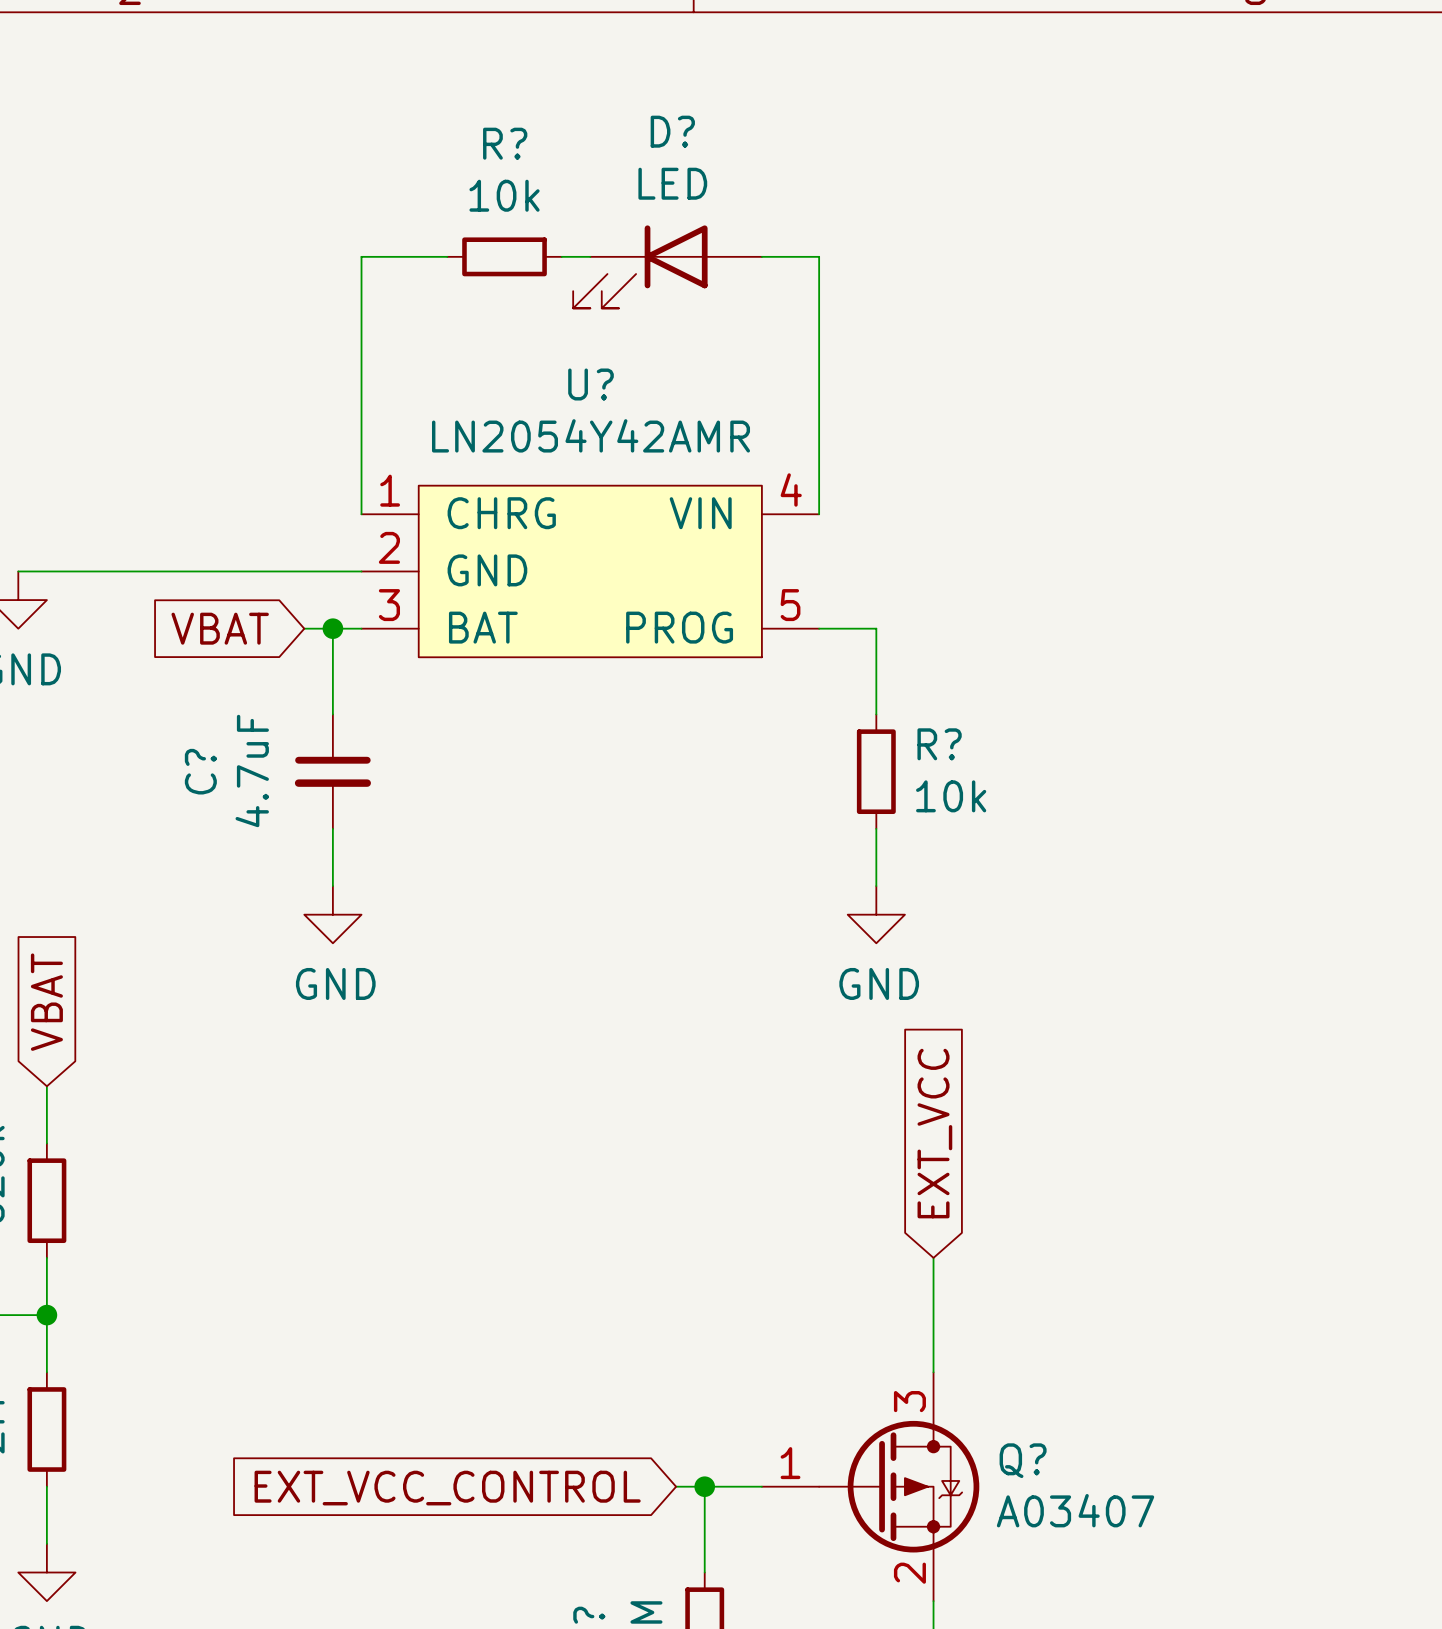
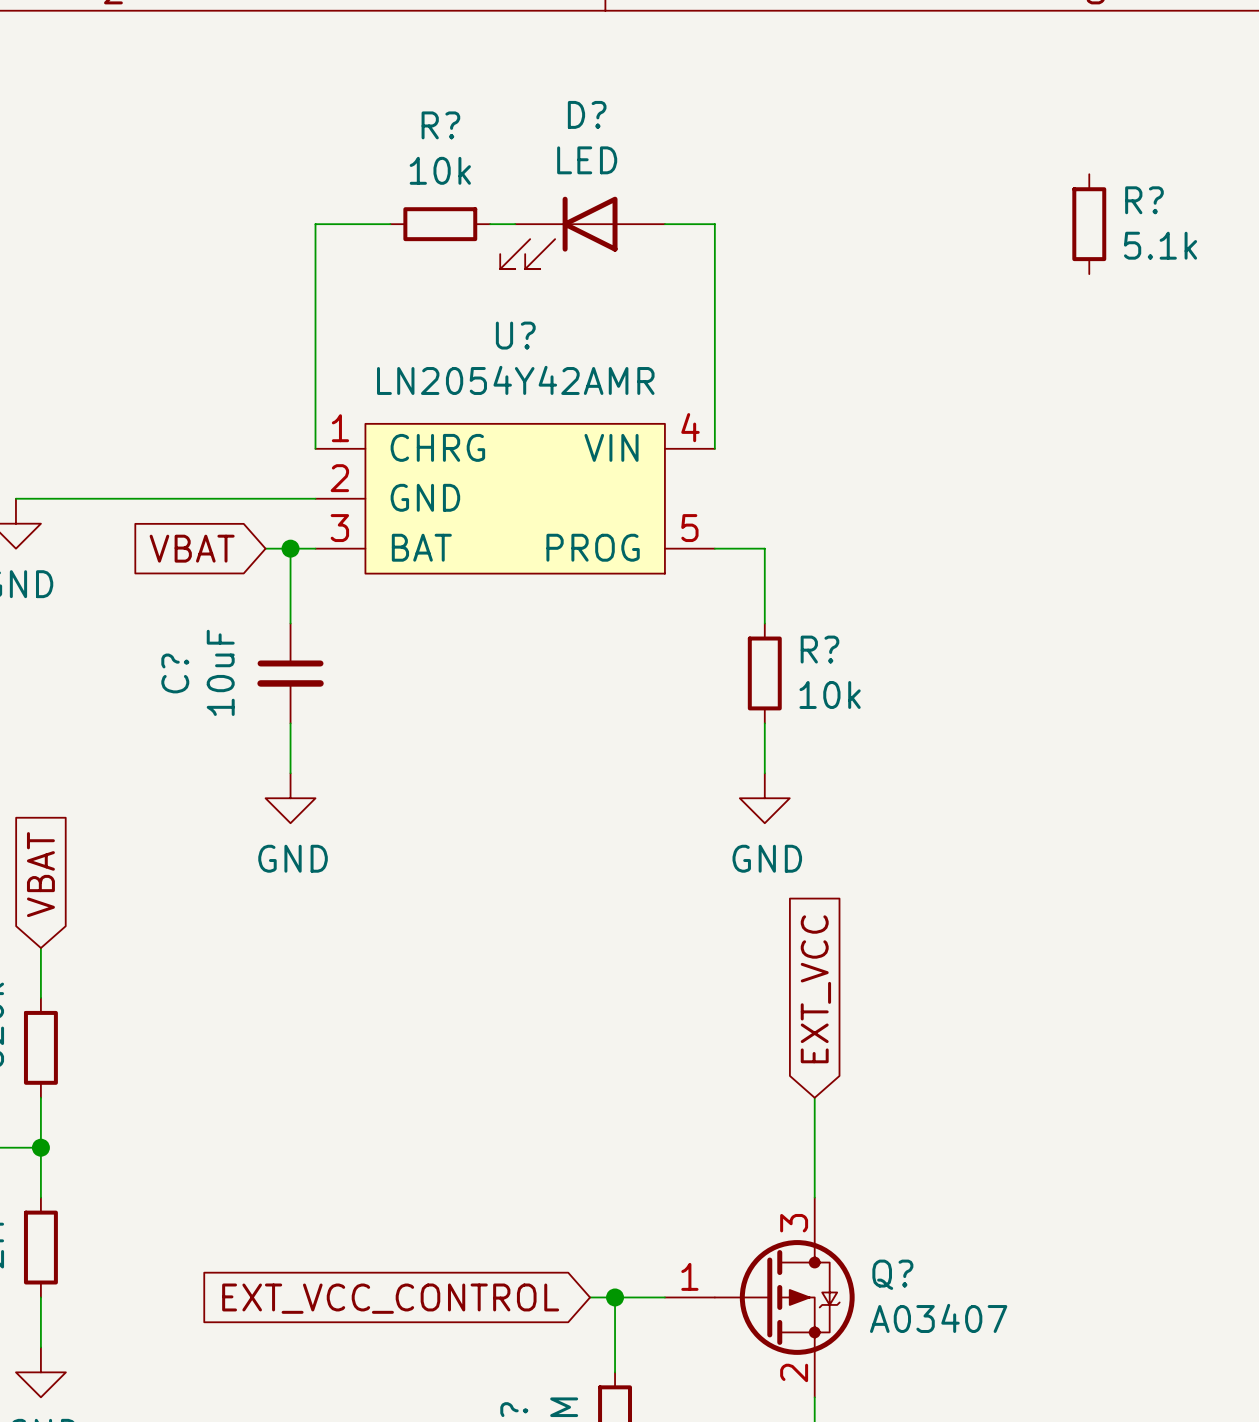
R?: none -> 5.1k (1089, 224)
C? value: 4.7uF (252, 771) -> 10uF (220, 672)

